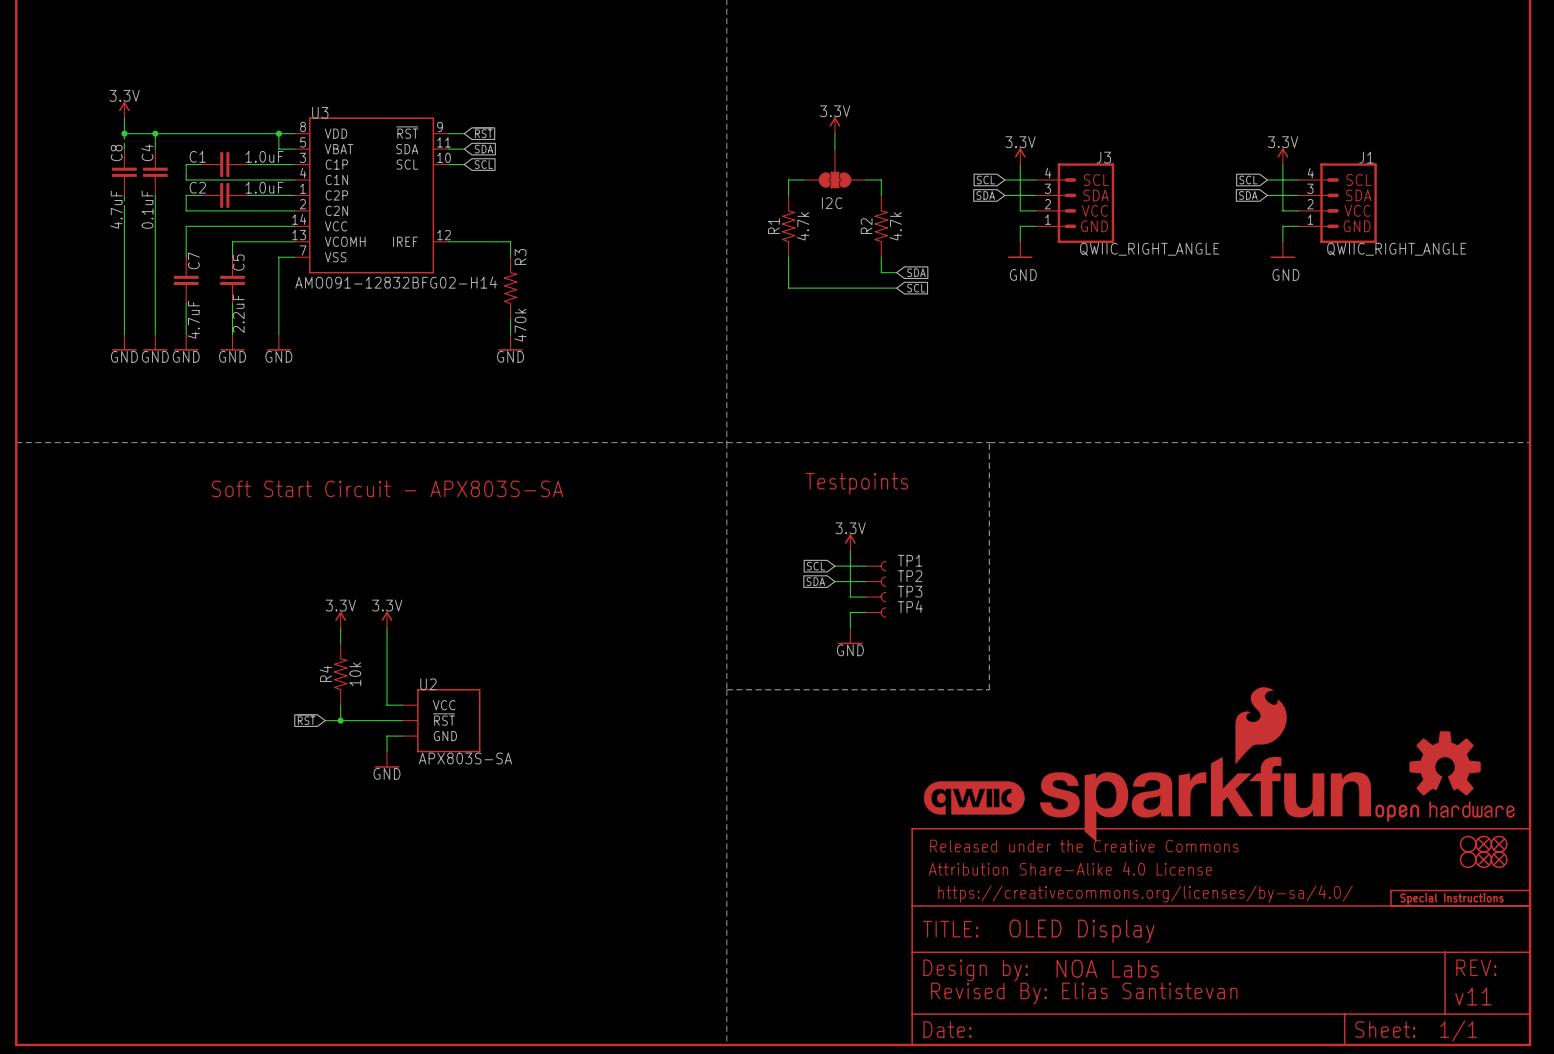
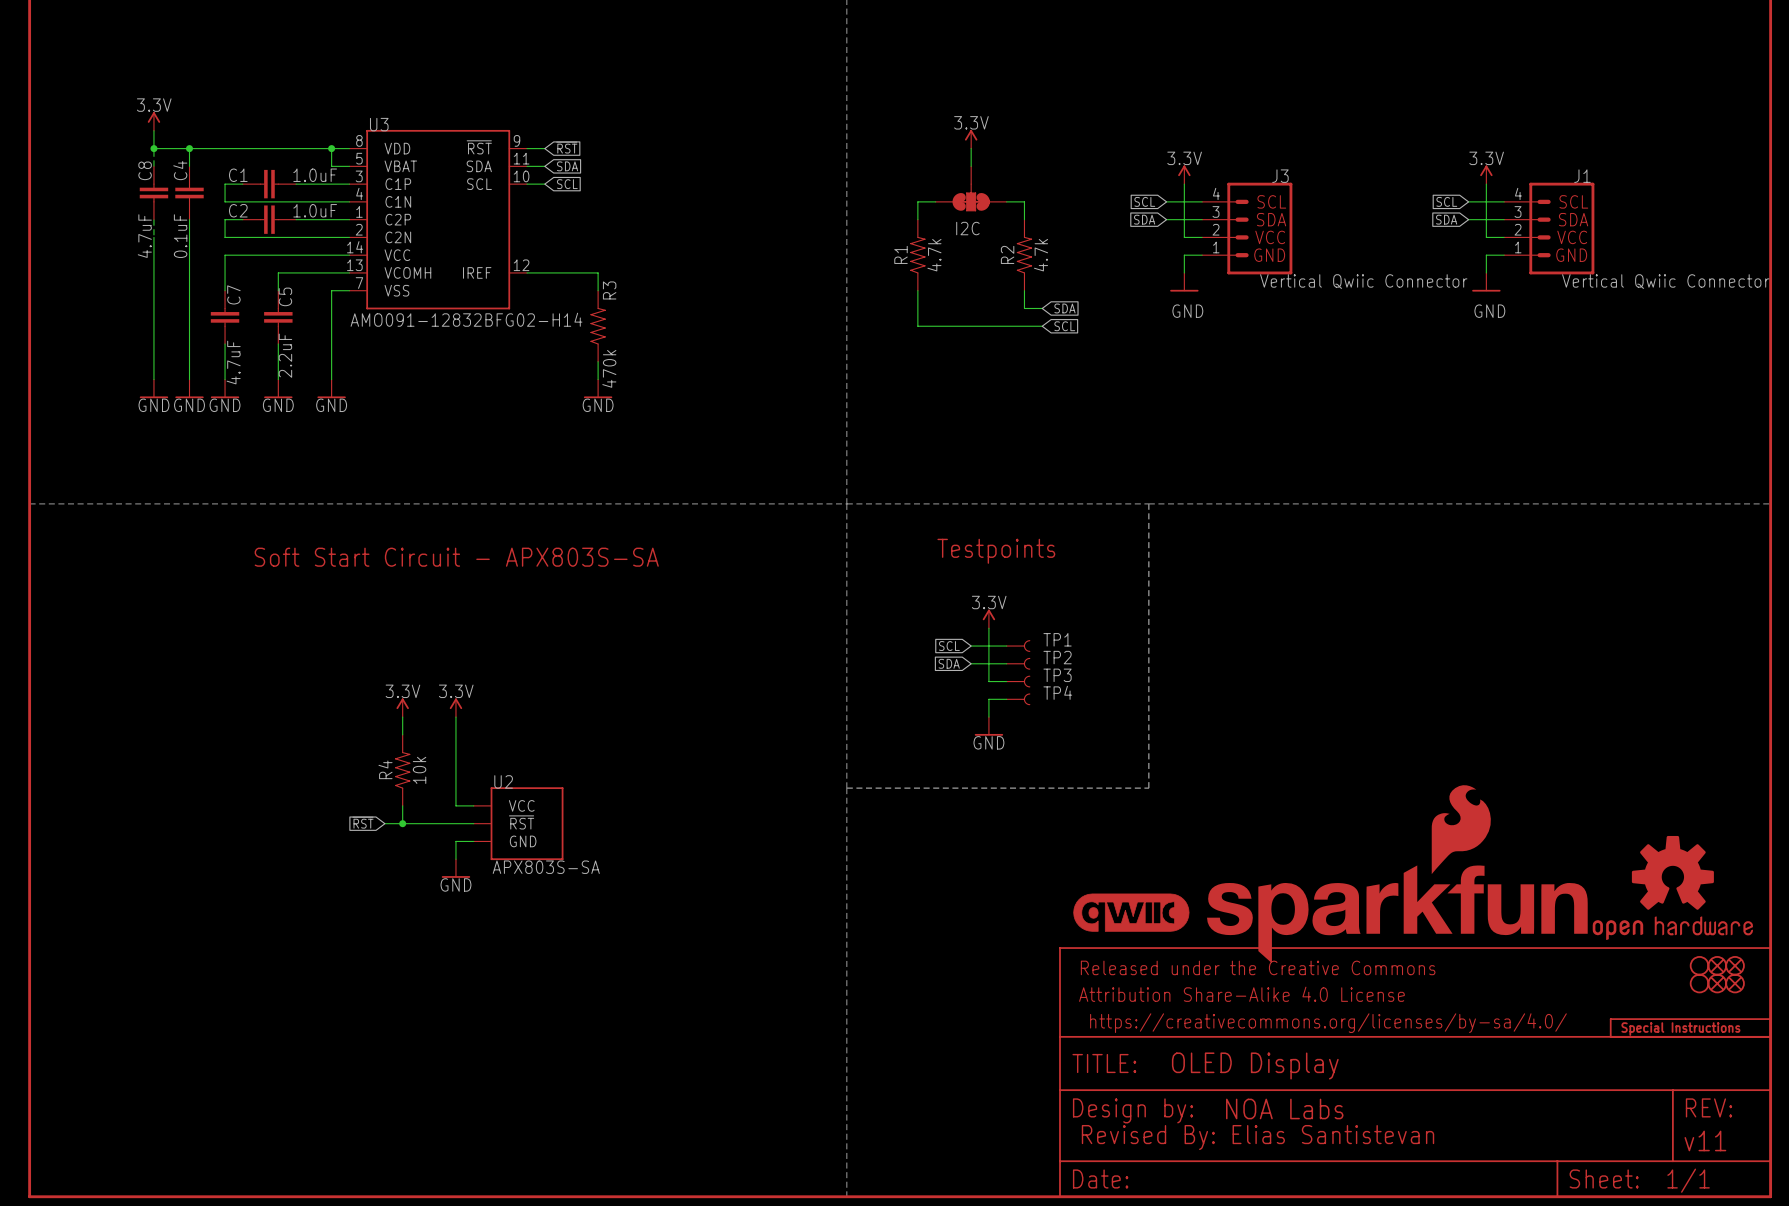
J3 value: QWIIC_RIGHT_ANGLE (1149, 249) -> Vertical Qwiic Connector (1363, 281)
J1 value: QWIIC_RIGHT_ANGLE (1396, 249) -> Vertical Qwiic Connector (1665, 281)

